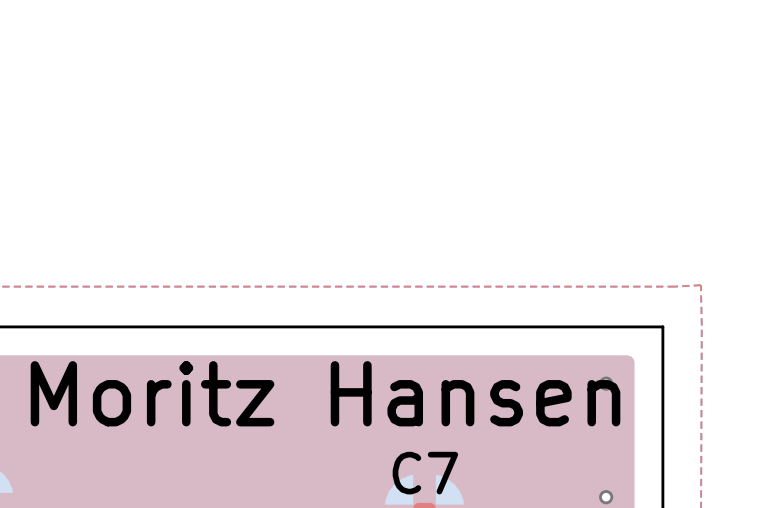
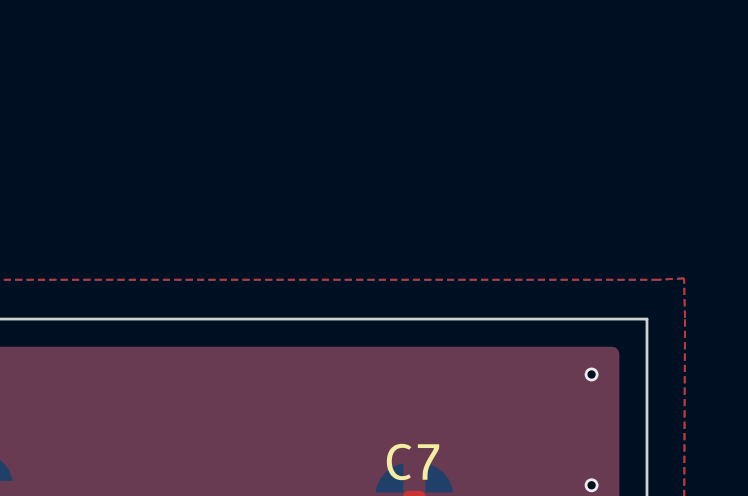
text: Moritz Hansen (325, 393) -> none

